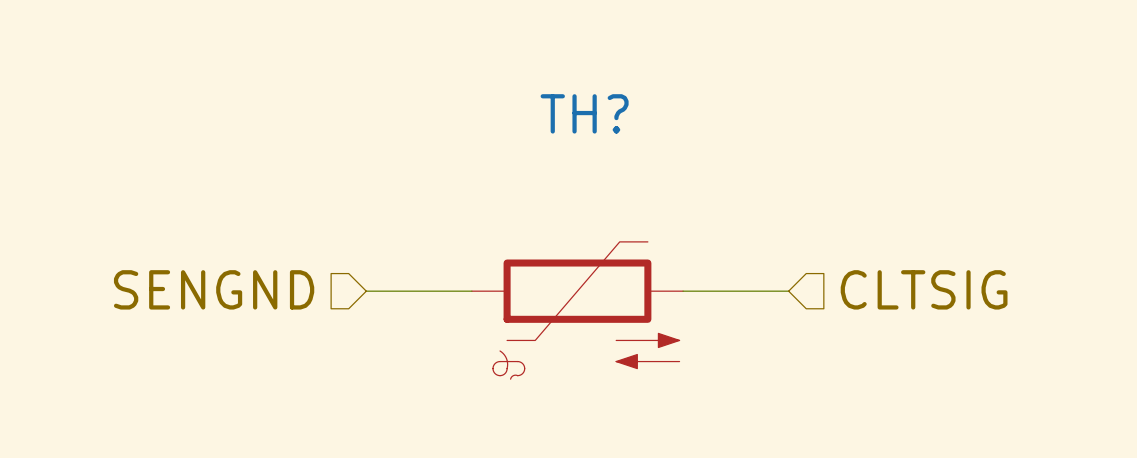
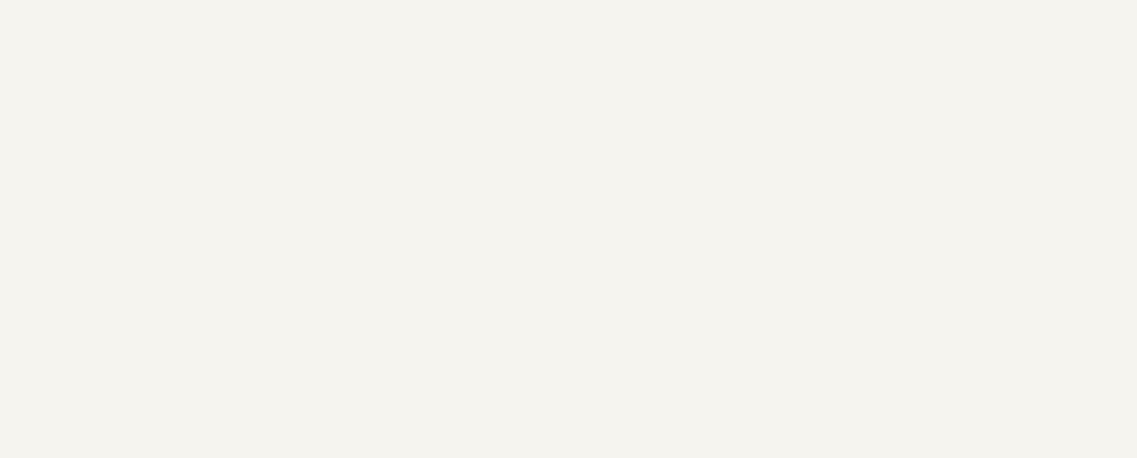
hierarchical label: SENGND (214, 289) -> none
hierarchical label: CLTSIG (924, 289) -> none
wire: (366, 291) (471, 291) -> none
wire: (683, 291) (788, 291) -> none
TH?: (577, 310) -> none

